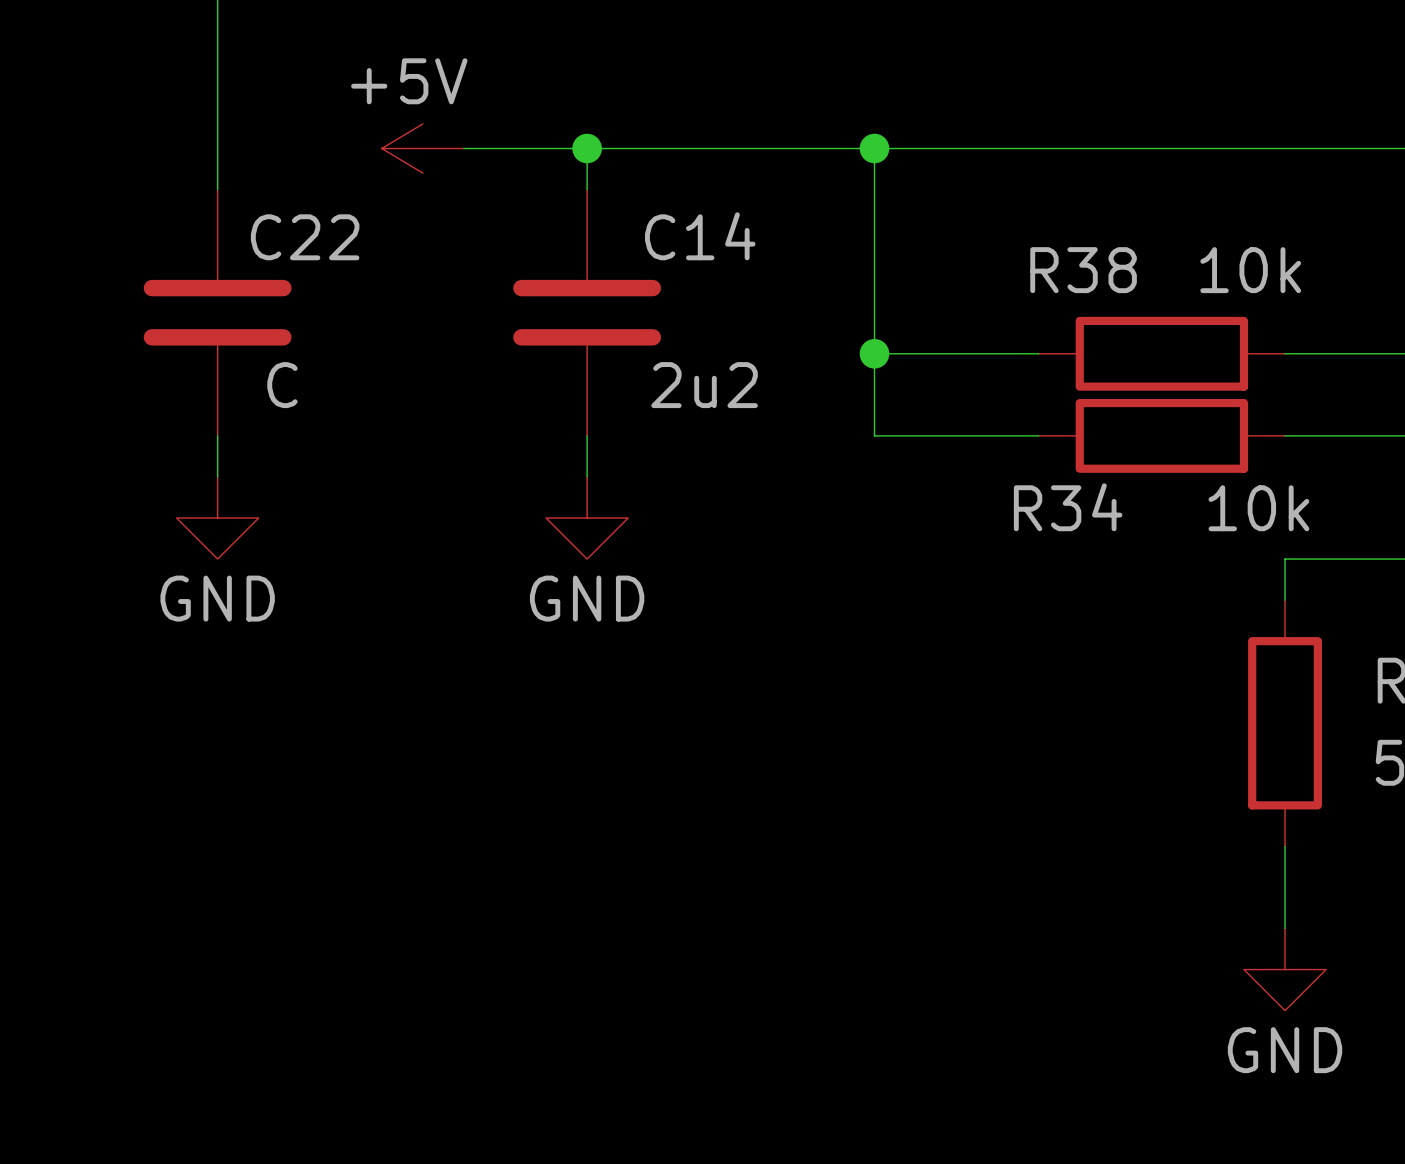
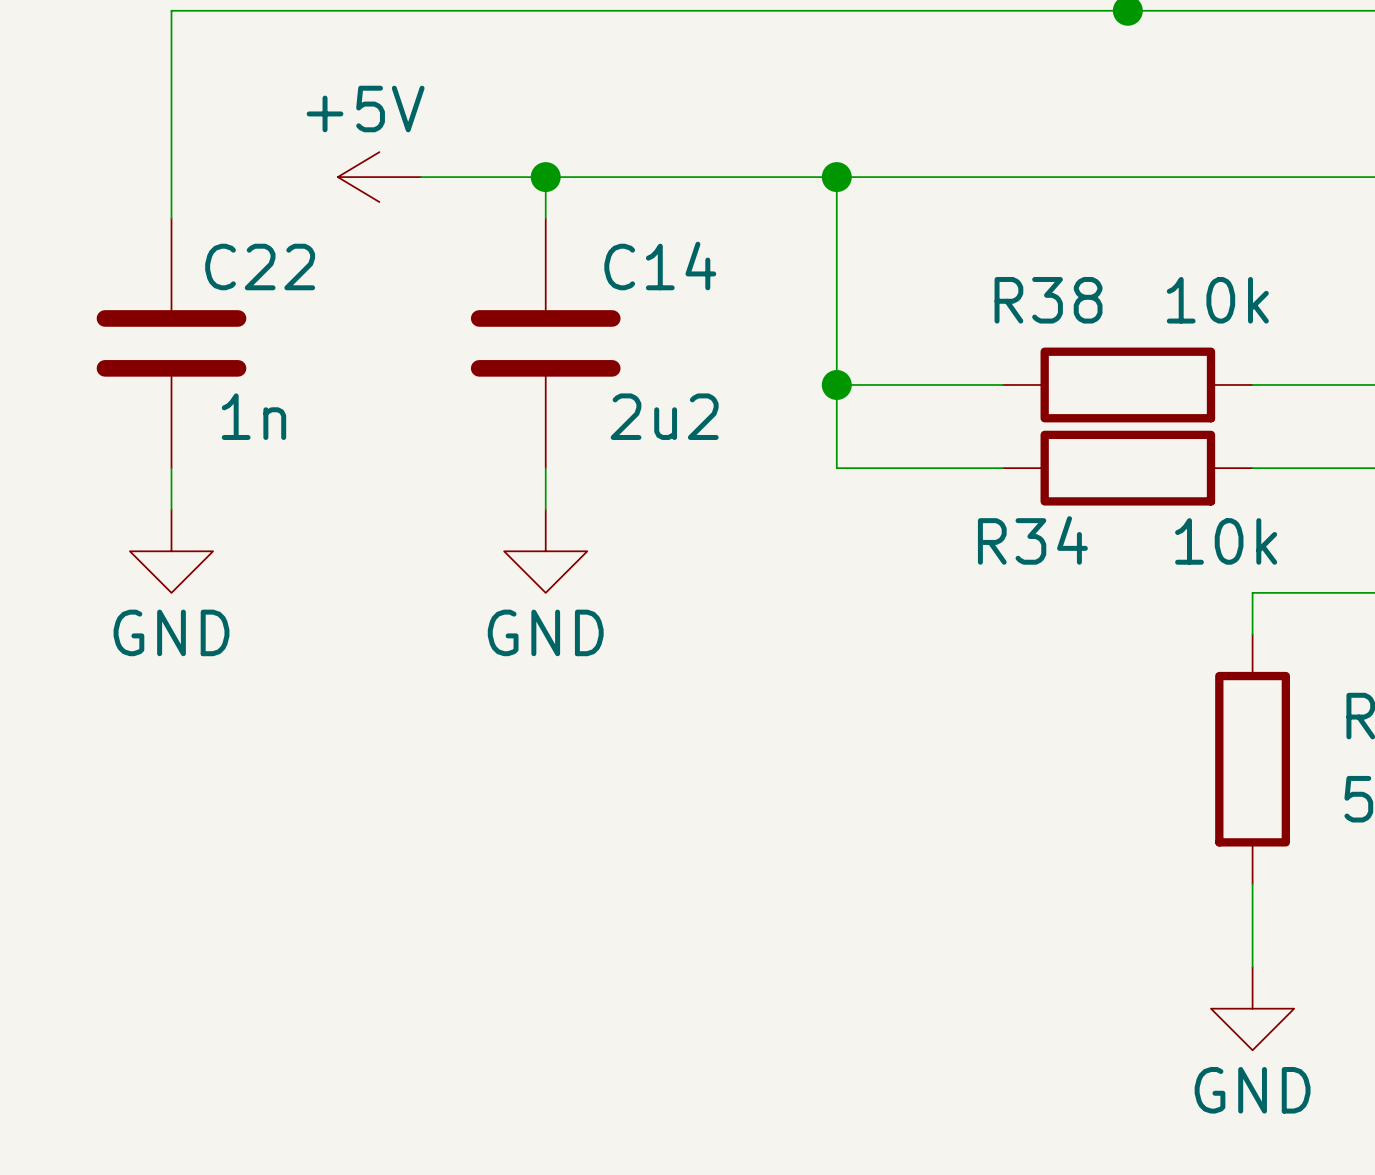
C22 value: C (282, 385) -> 1n (253, 416)

